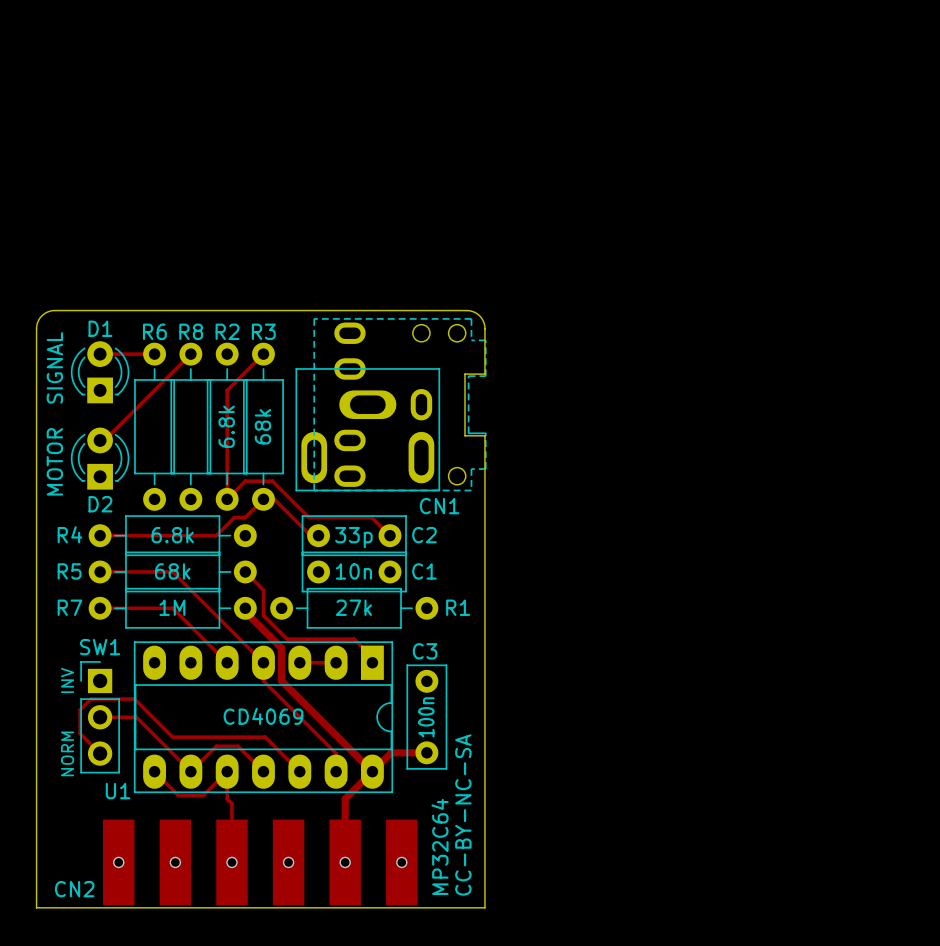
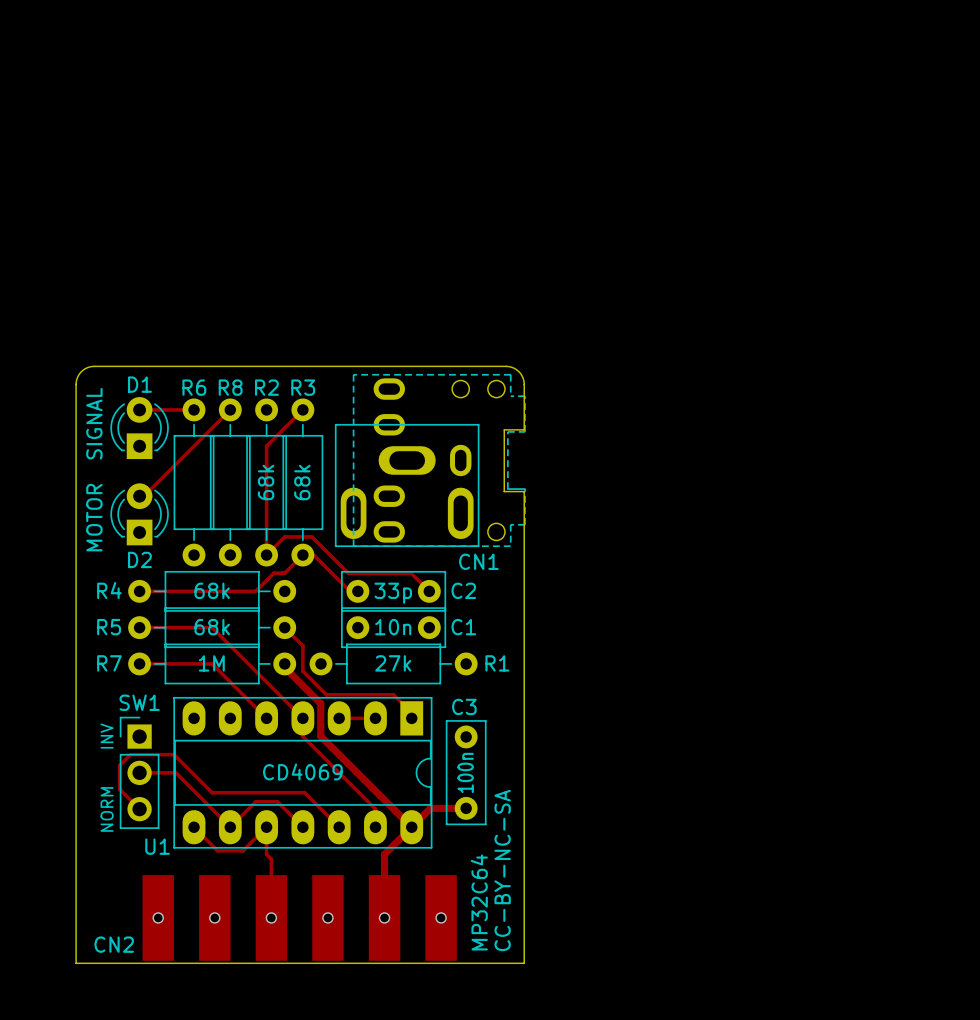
R2 value: 6.8k (226, 426) -> 68k (266, 482)
R4 value: 6.8k (172, 535) -> 68k (212, 590)

